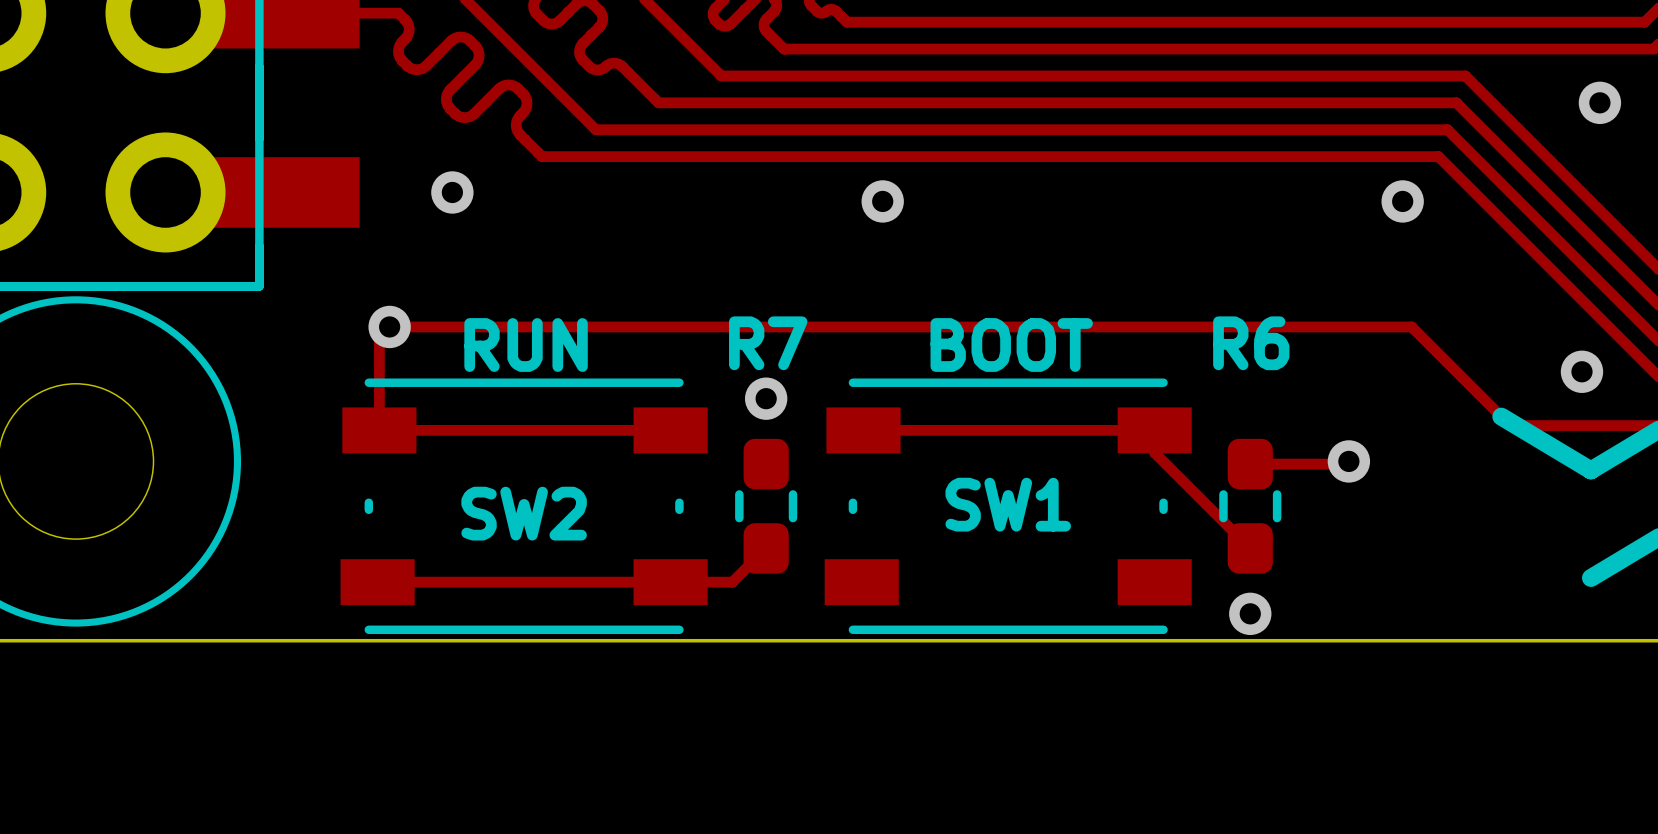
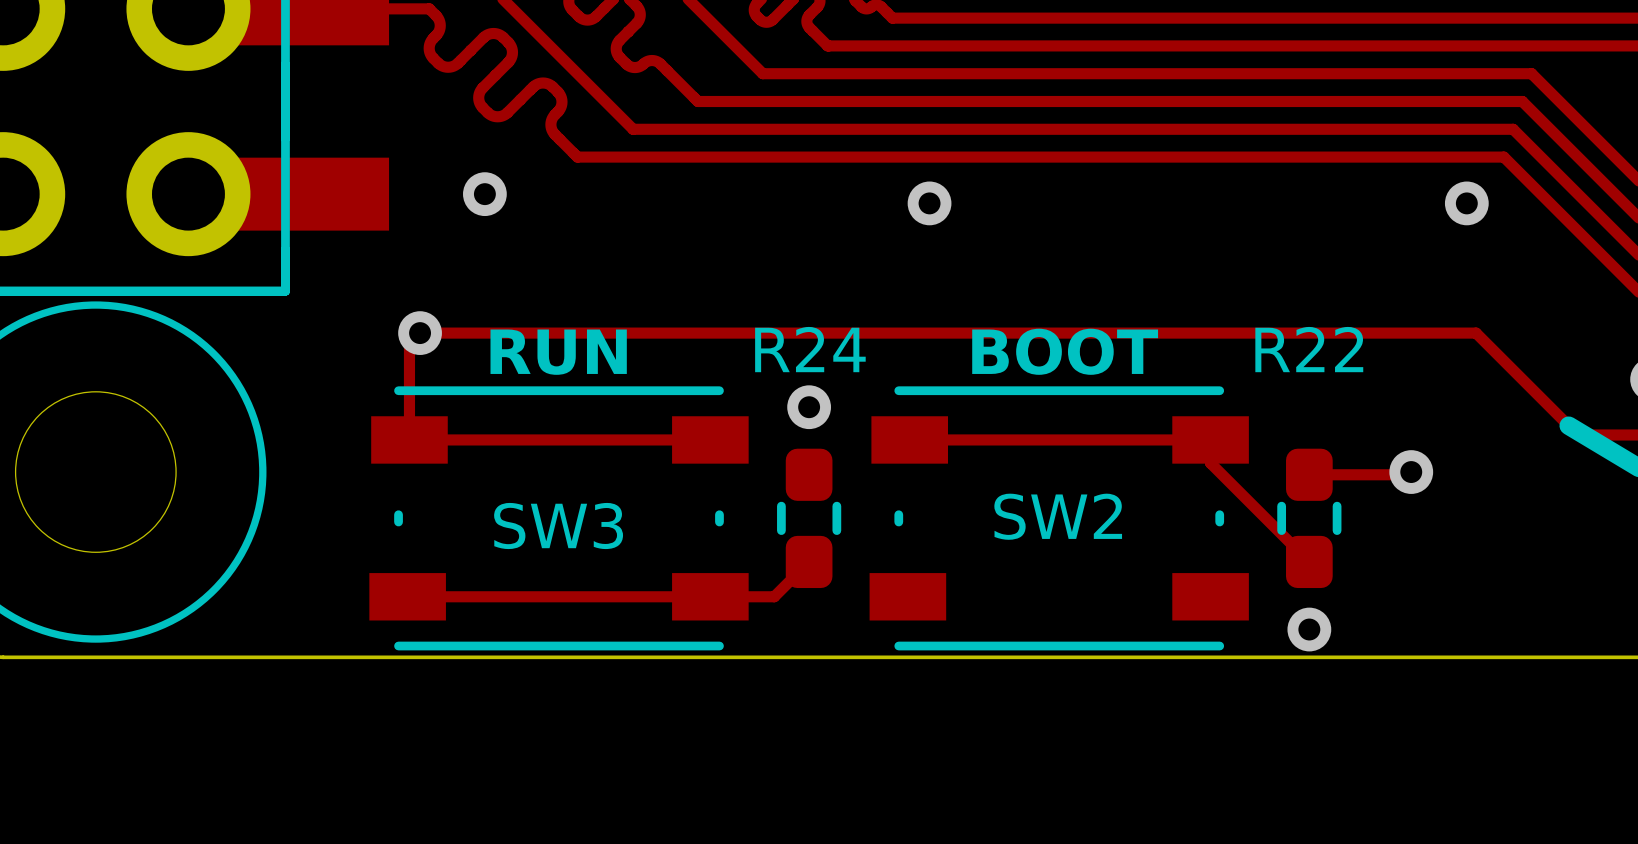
R7 name: R7 (768, 343) -> R24 (810, 349)
R6 name: R6 (1251, 343) -> R22 (1309, 349)
SW1 name: SW1 (1008, 504) -> SW2 (1058, 516)
SW2 name: SW2 (524, 513) -> SW3 (558, 525)

